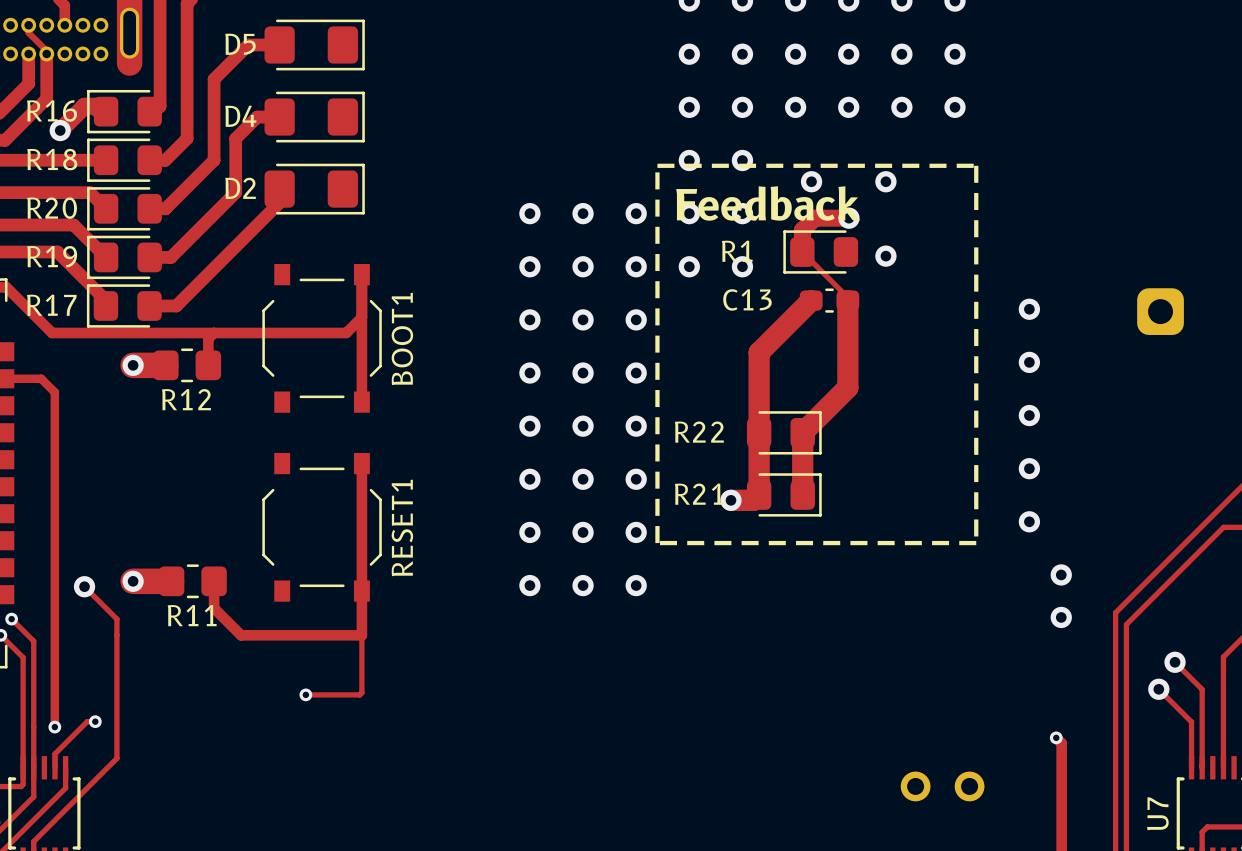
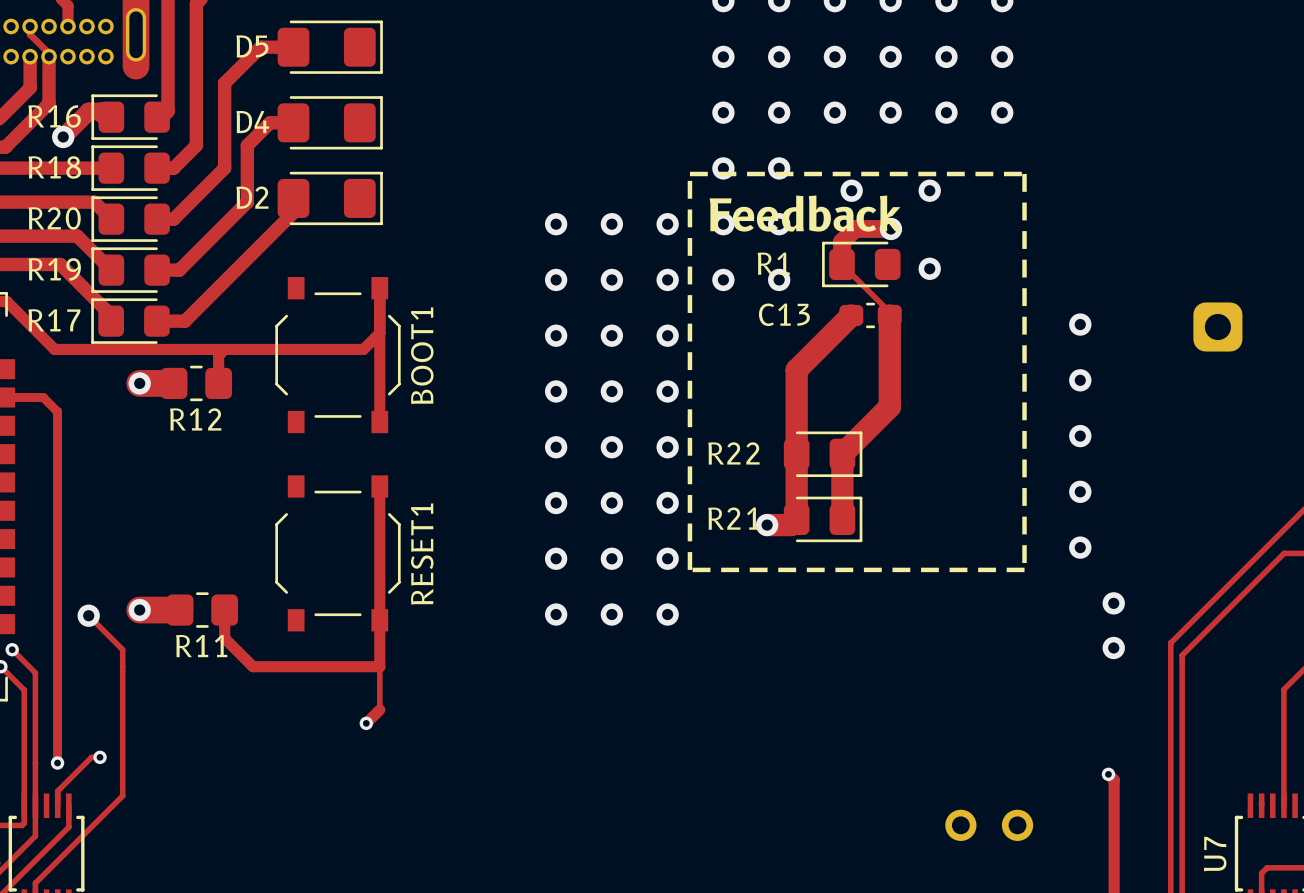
track: (1175, 662) (1202, 689) (1202, 765) -> none
via: (1175, 662) -> none
track: (361, 676) (361, 692) (359, 694) (305, 694) -> (379, 709) (366, 723)
track: (1158, 689) (1191, 722) (1191, 767) -> none
via: (1158, 689) -> none
via position: (305, 694) -> (366, 723)

